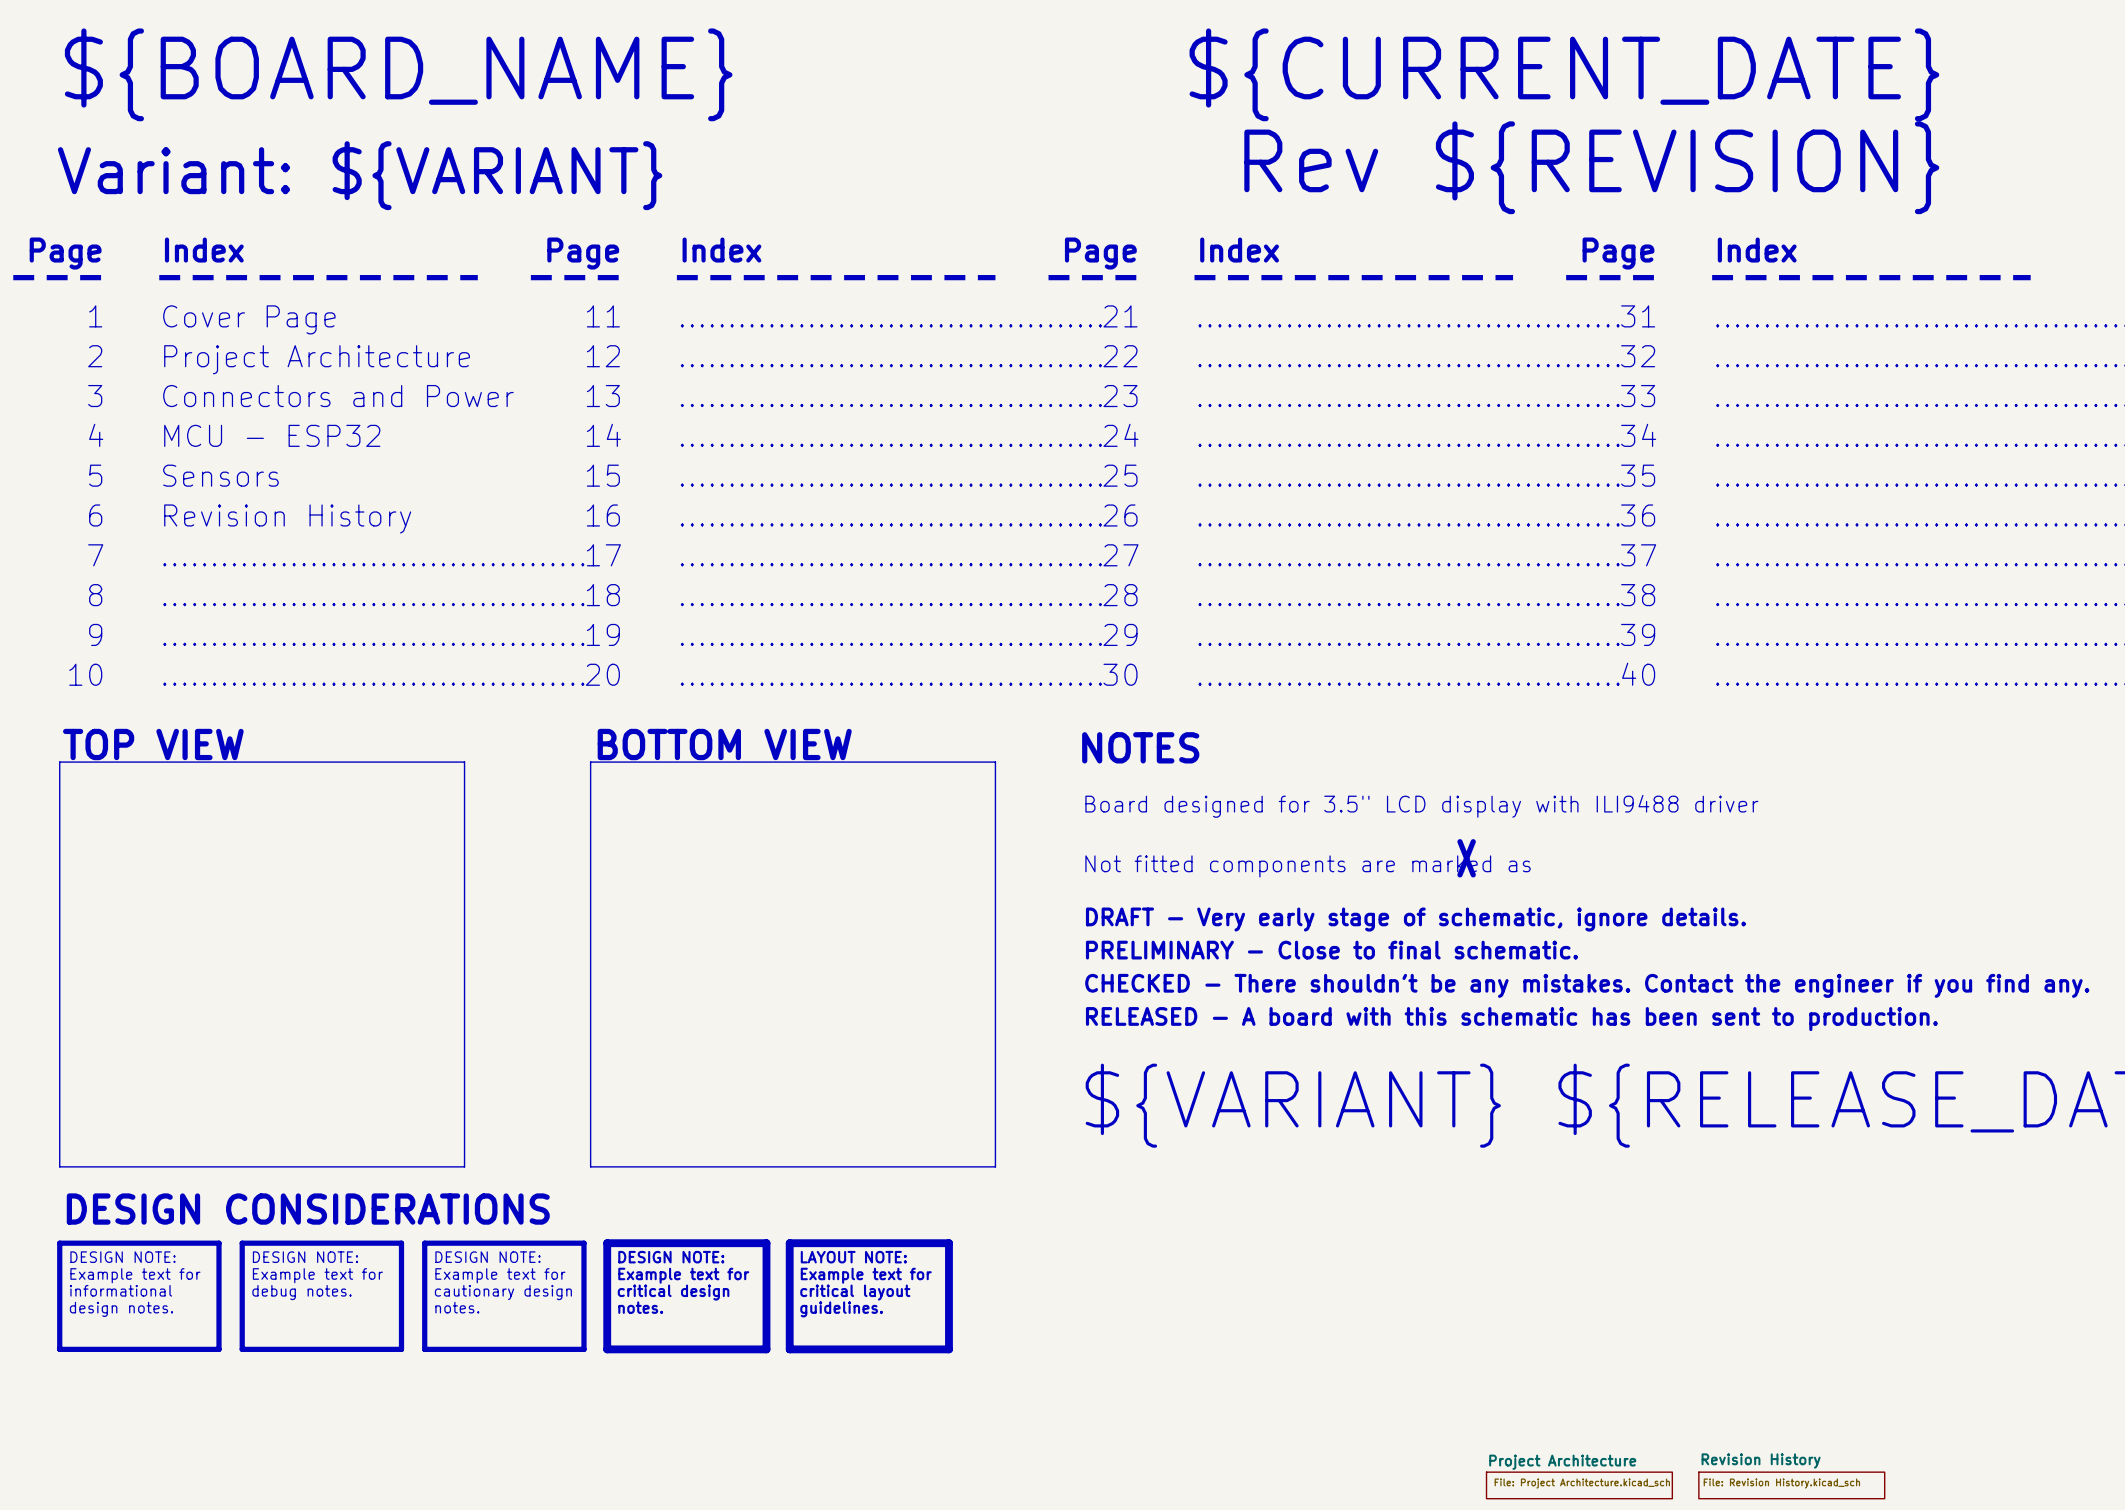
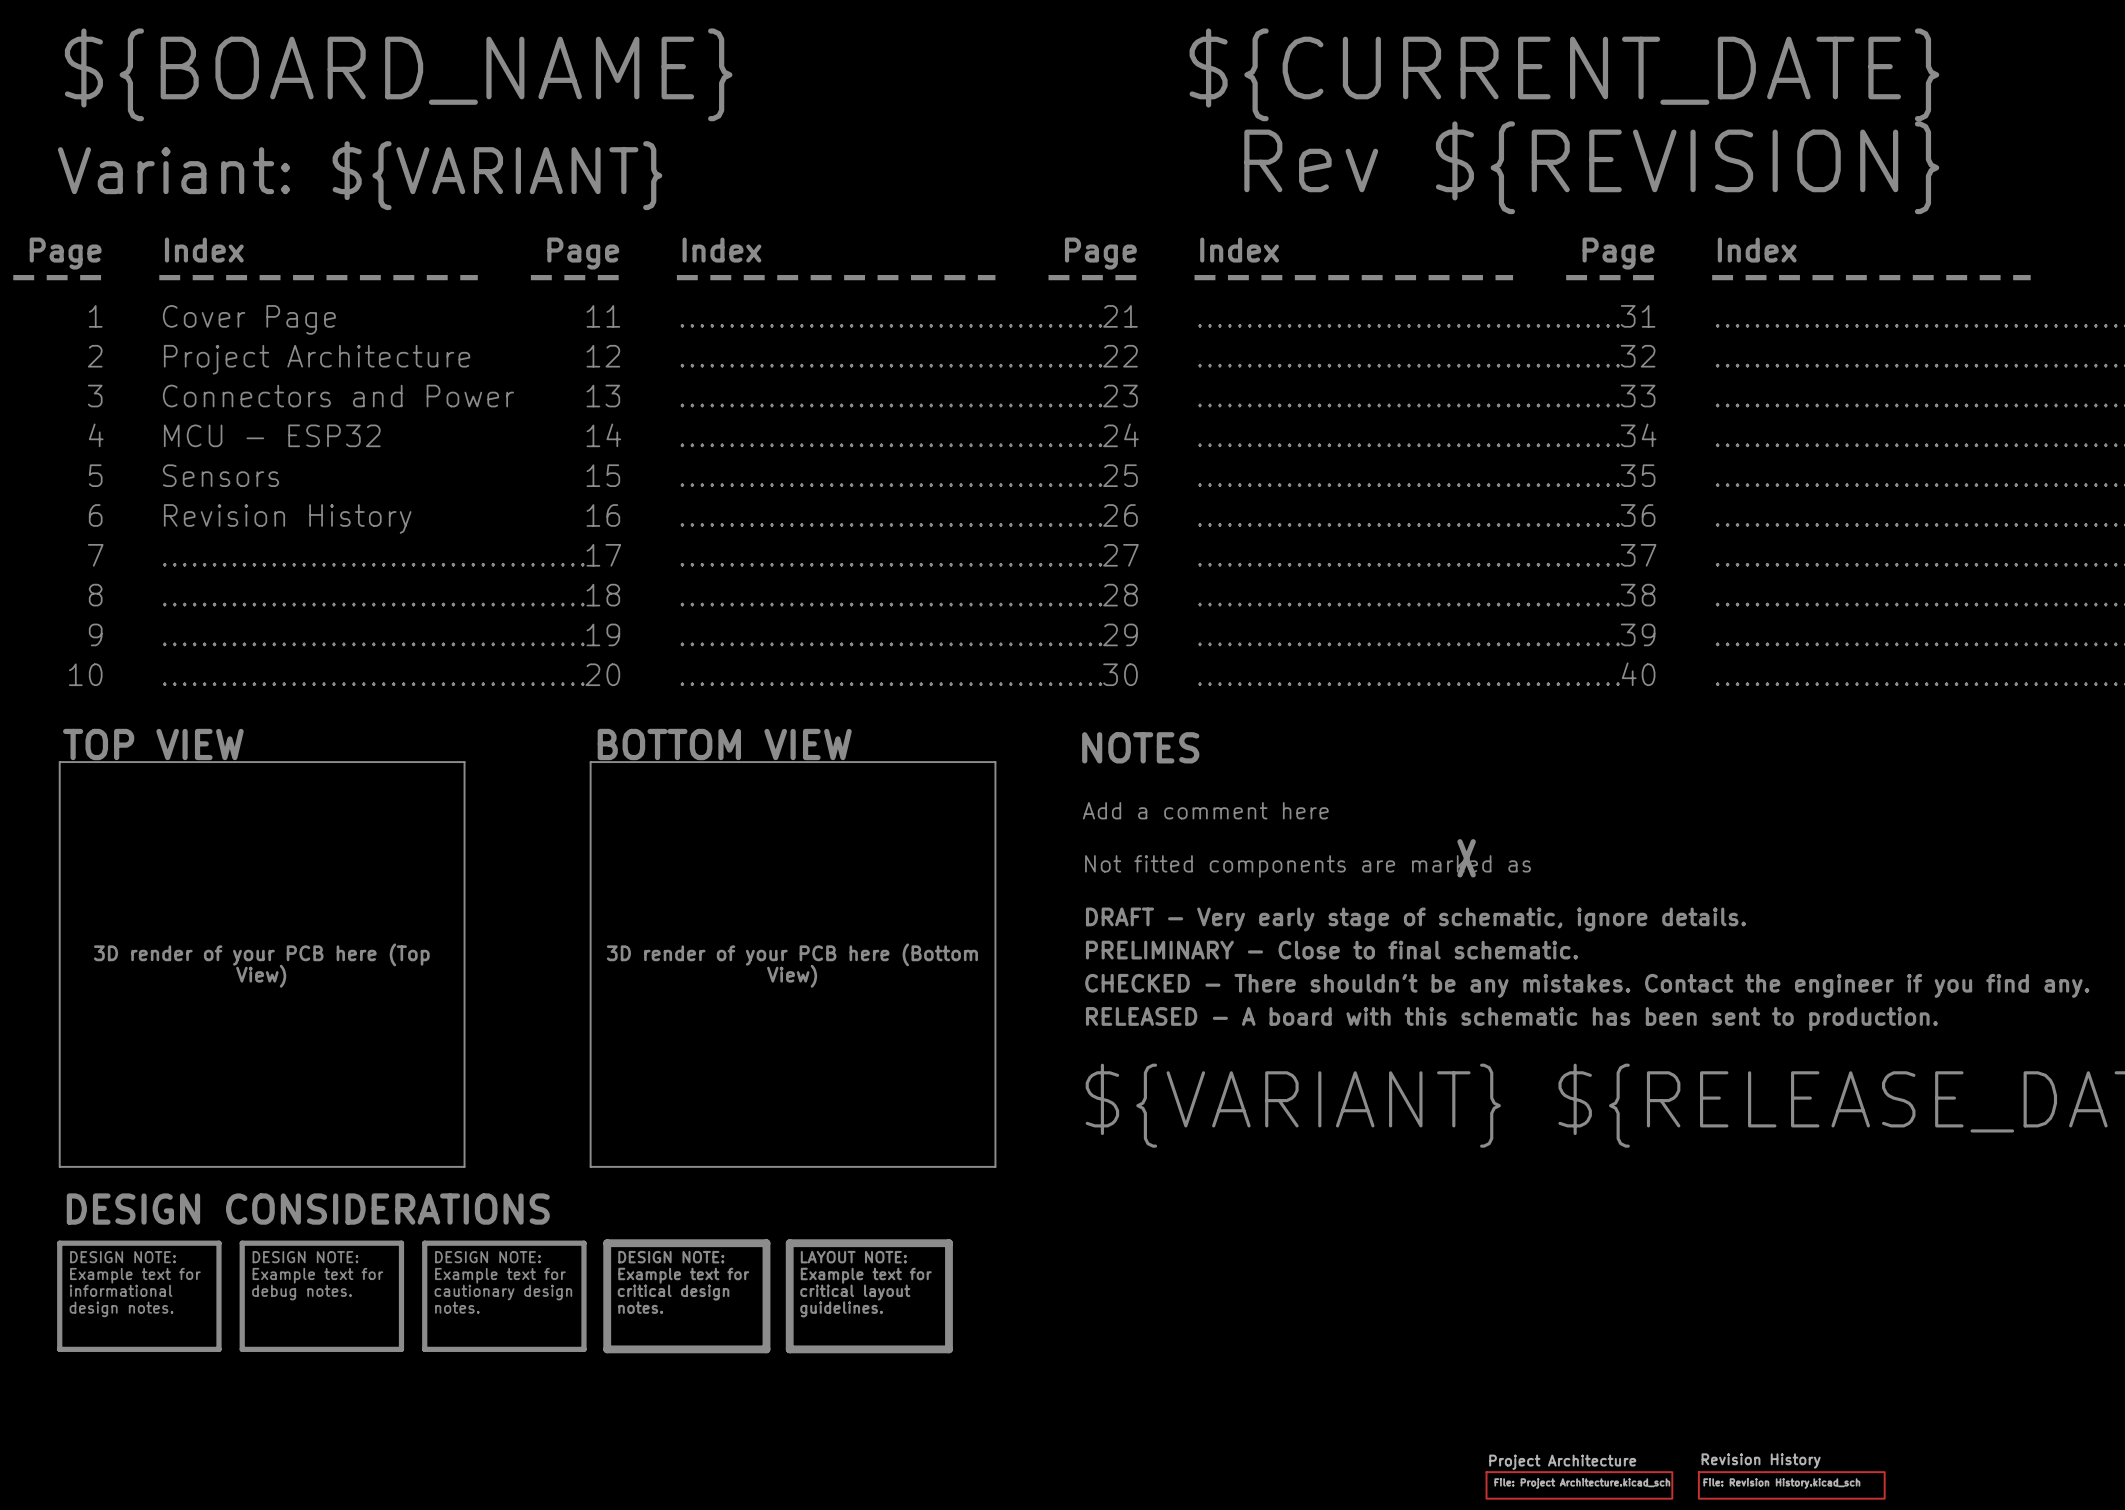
text: Board designed for 3.5" LCD display with ILI9488 driver (1421, 806) -> none
text: none -> Add a comment here (1205, 810)
text: none -> 3D render of your PCB here (Top (261, 954)
text: none -> 3D render of your PCB here (Bottom (792, 954)
text: none -> View) (261, 976)
text: none -> View) (792, 976)

